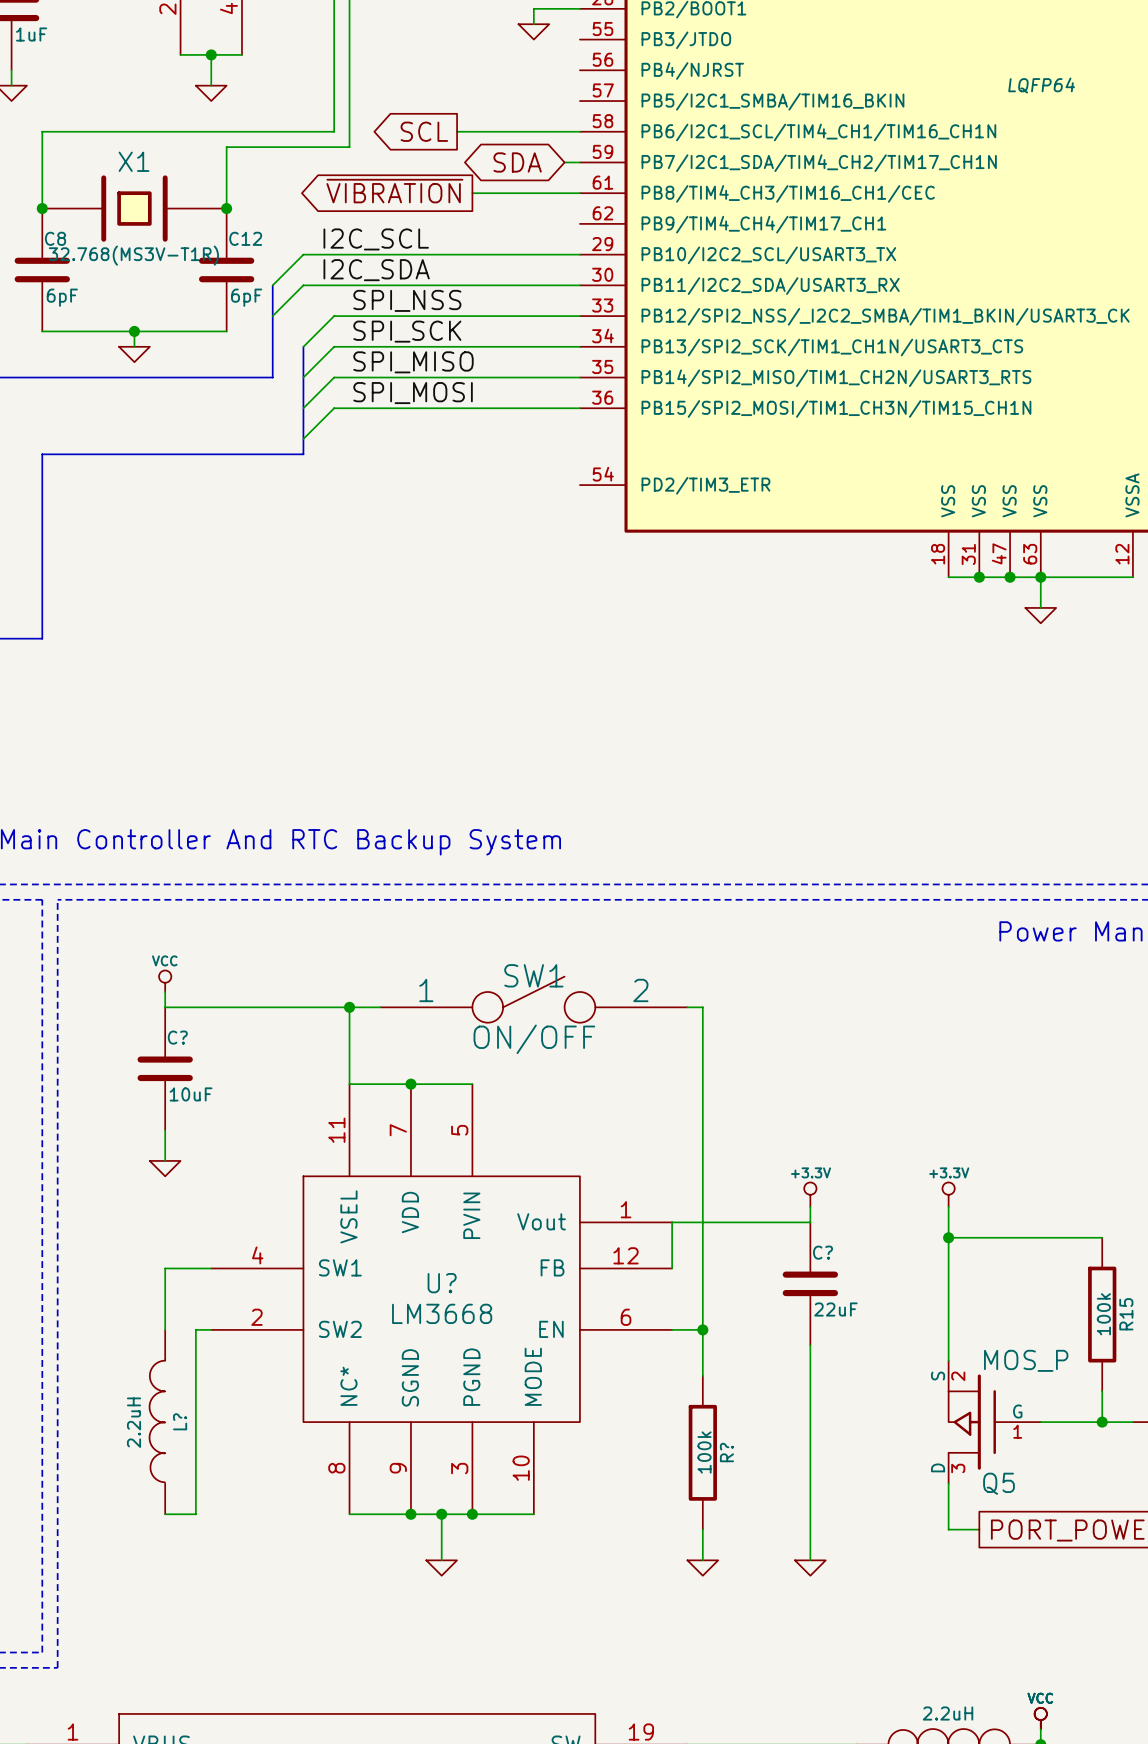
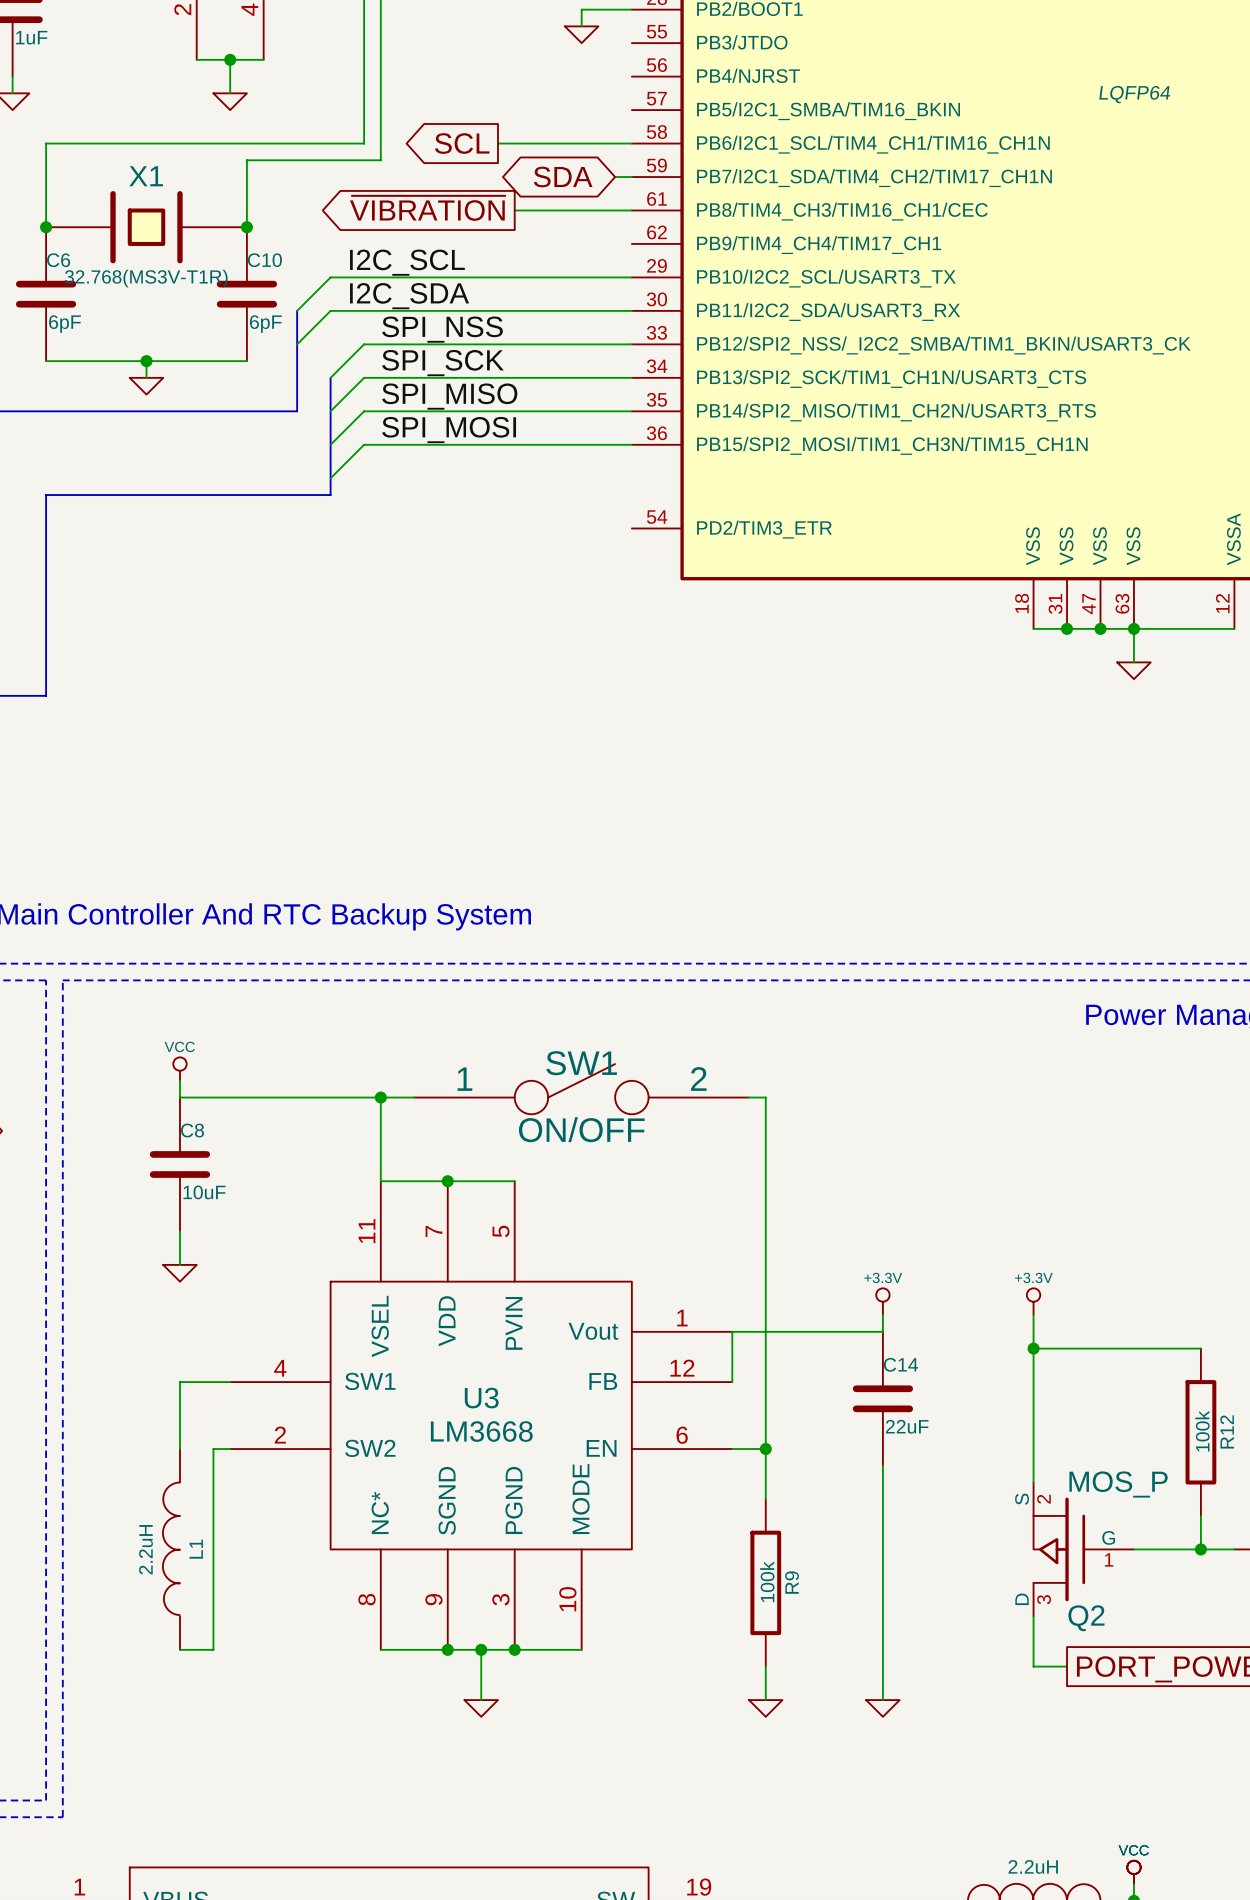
C8 name: C8 (55, 238) -> C6 (58, 260)
C12 name: C12 (245, 238) -> C10 (264, 260)
C? name: C? (177, 1037) -> C8 (192, 1130)
C? name: C? (822, 1252) -> C14 (900, 1364)
U? name: U? (442, 1283) -> U3 (481, 1398)
R15 name: R15 (1126, 1314) -> R12 (1227, 1431)
L? name: L? (180, 1421) -> L1 (196, 1549)
R? name: R? (726, 1452) -> R9 (792, 1582)
Q5 name: Q5 (998, 1483) -> Q2 (1086, 1618)

